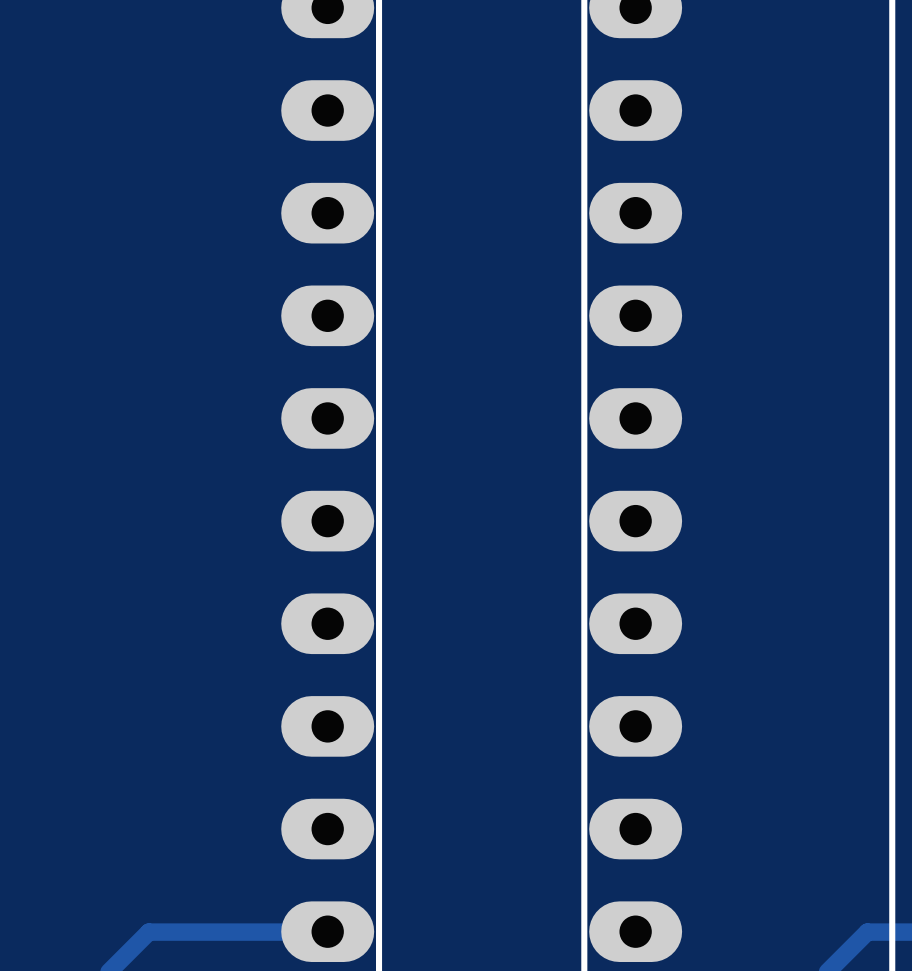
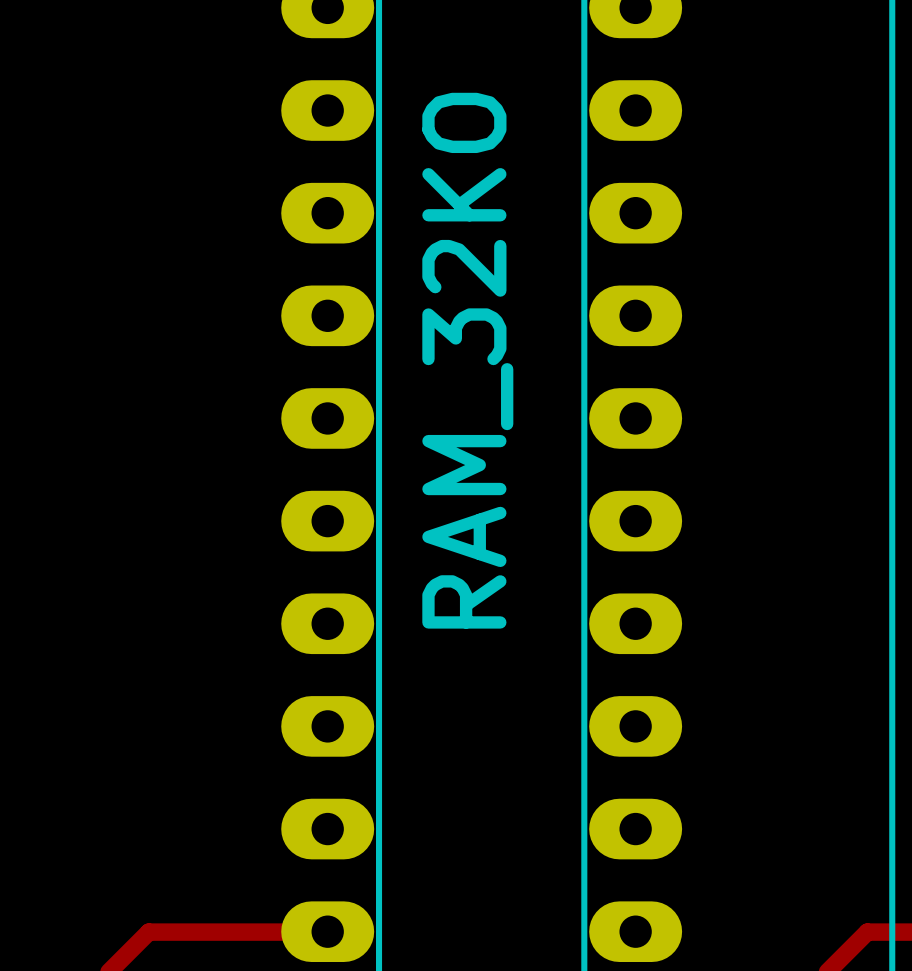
part value: none -> RAM_32KO (467, 360)

